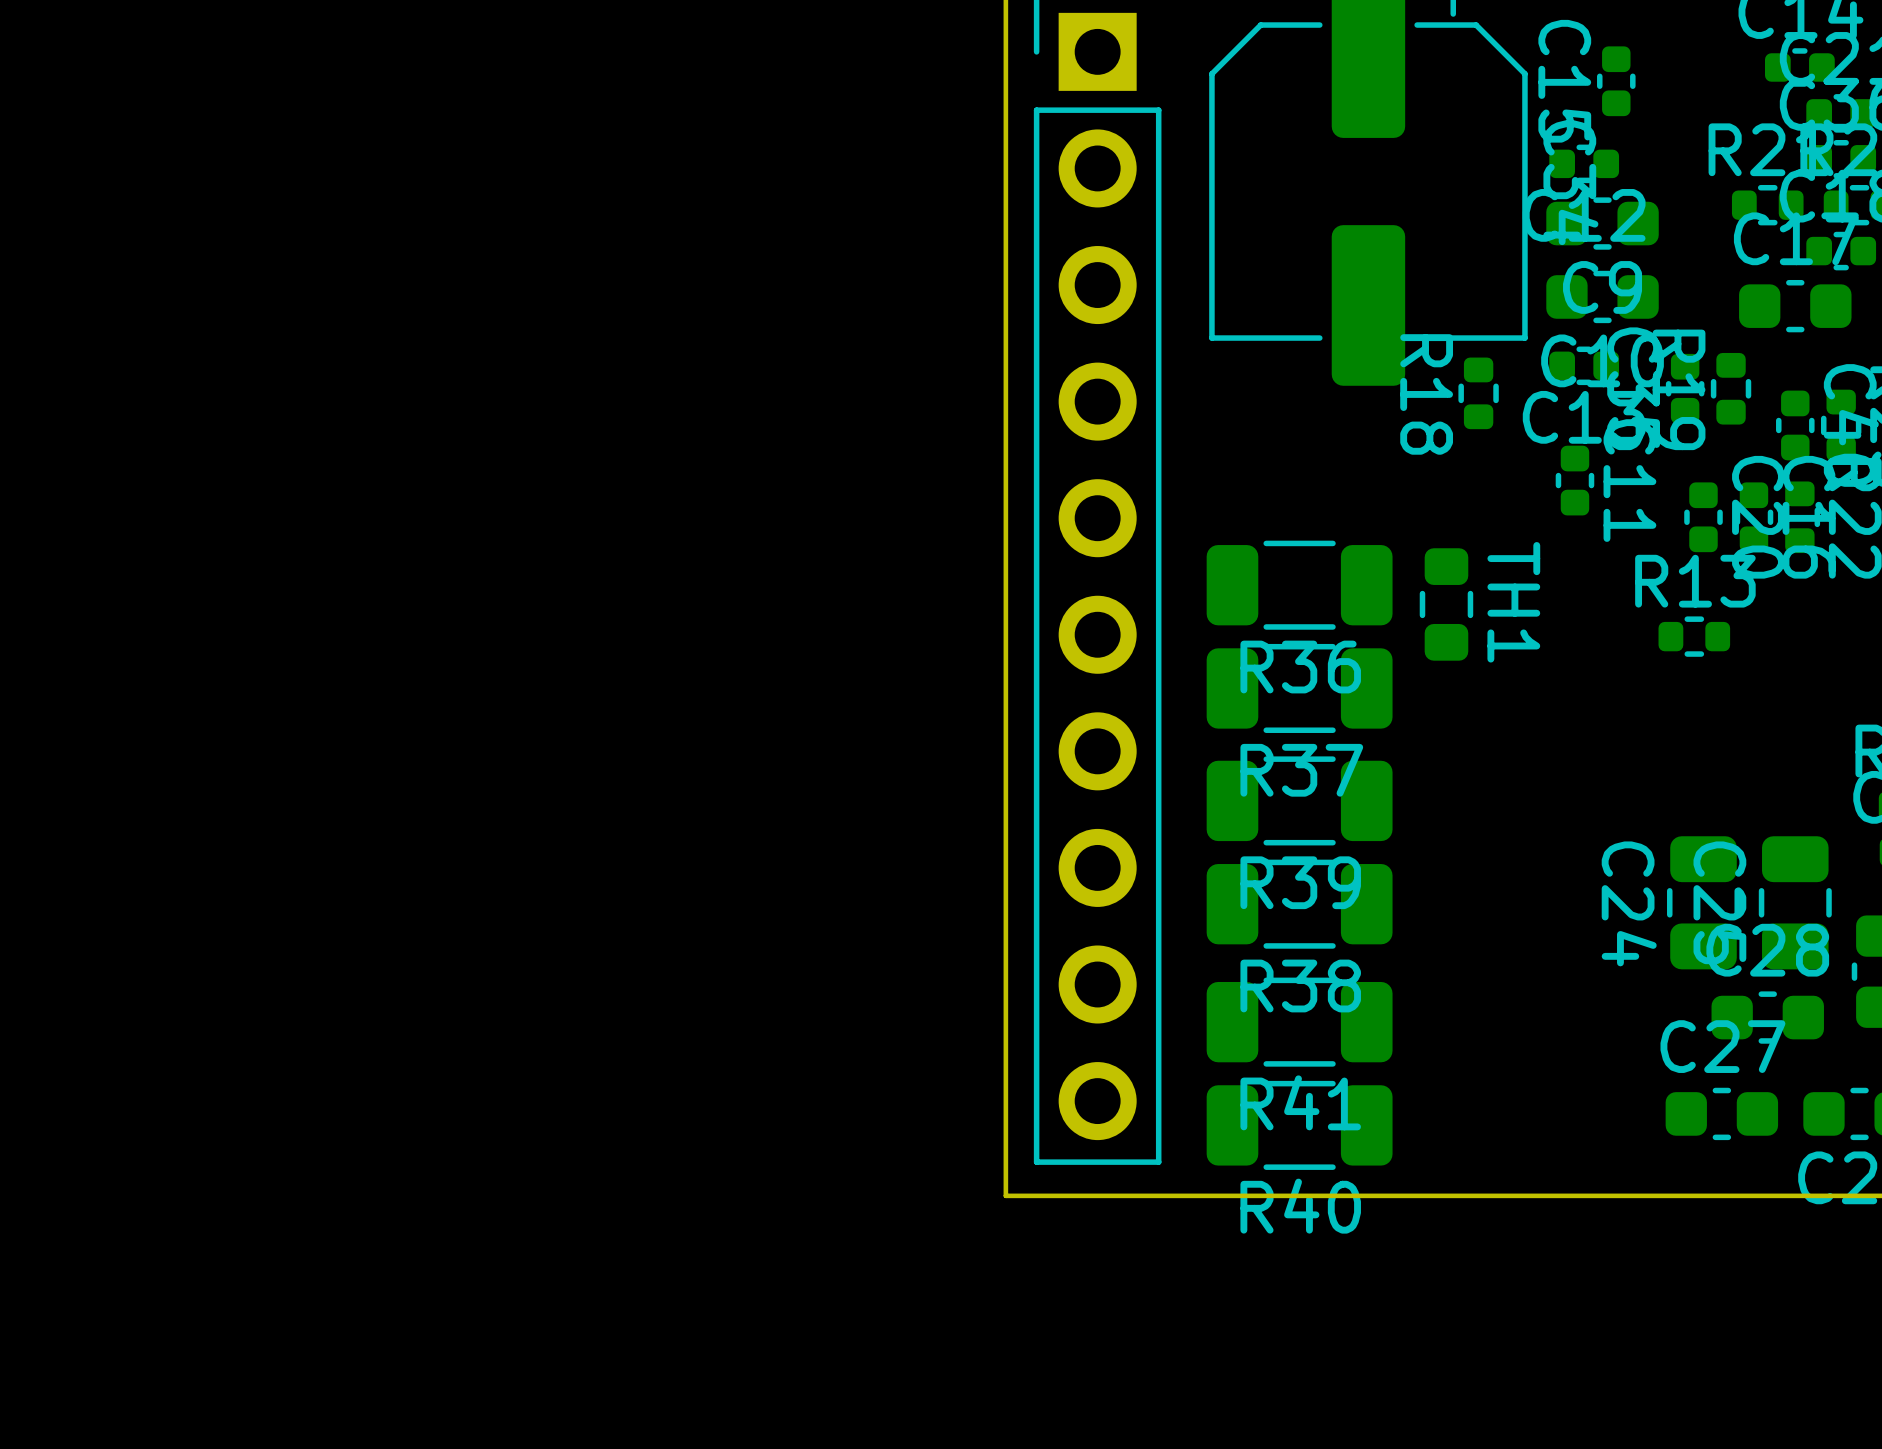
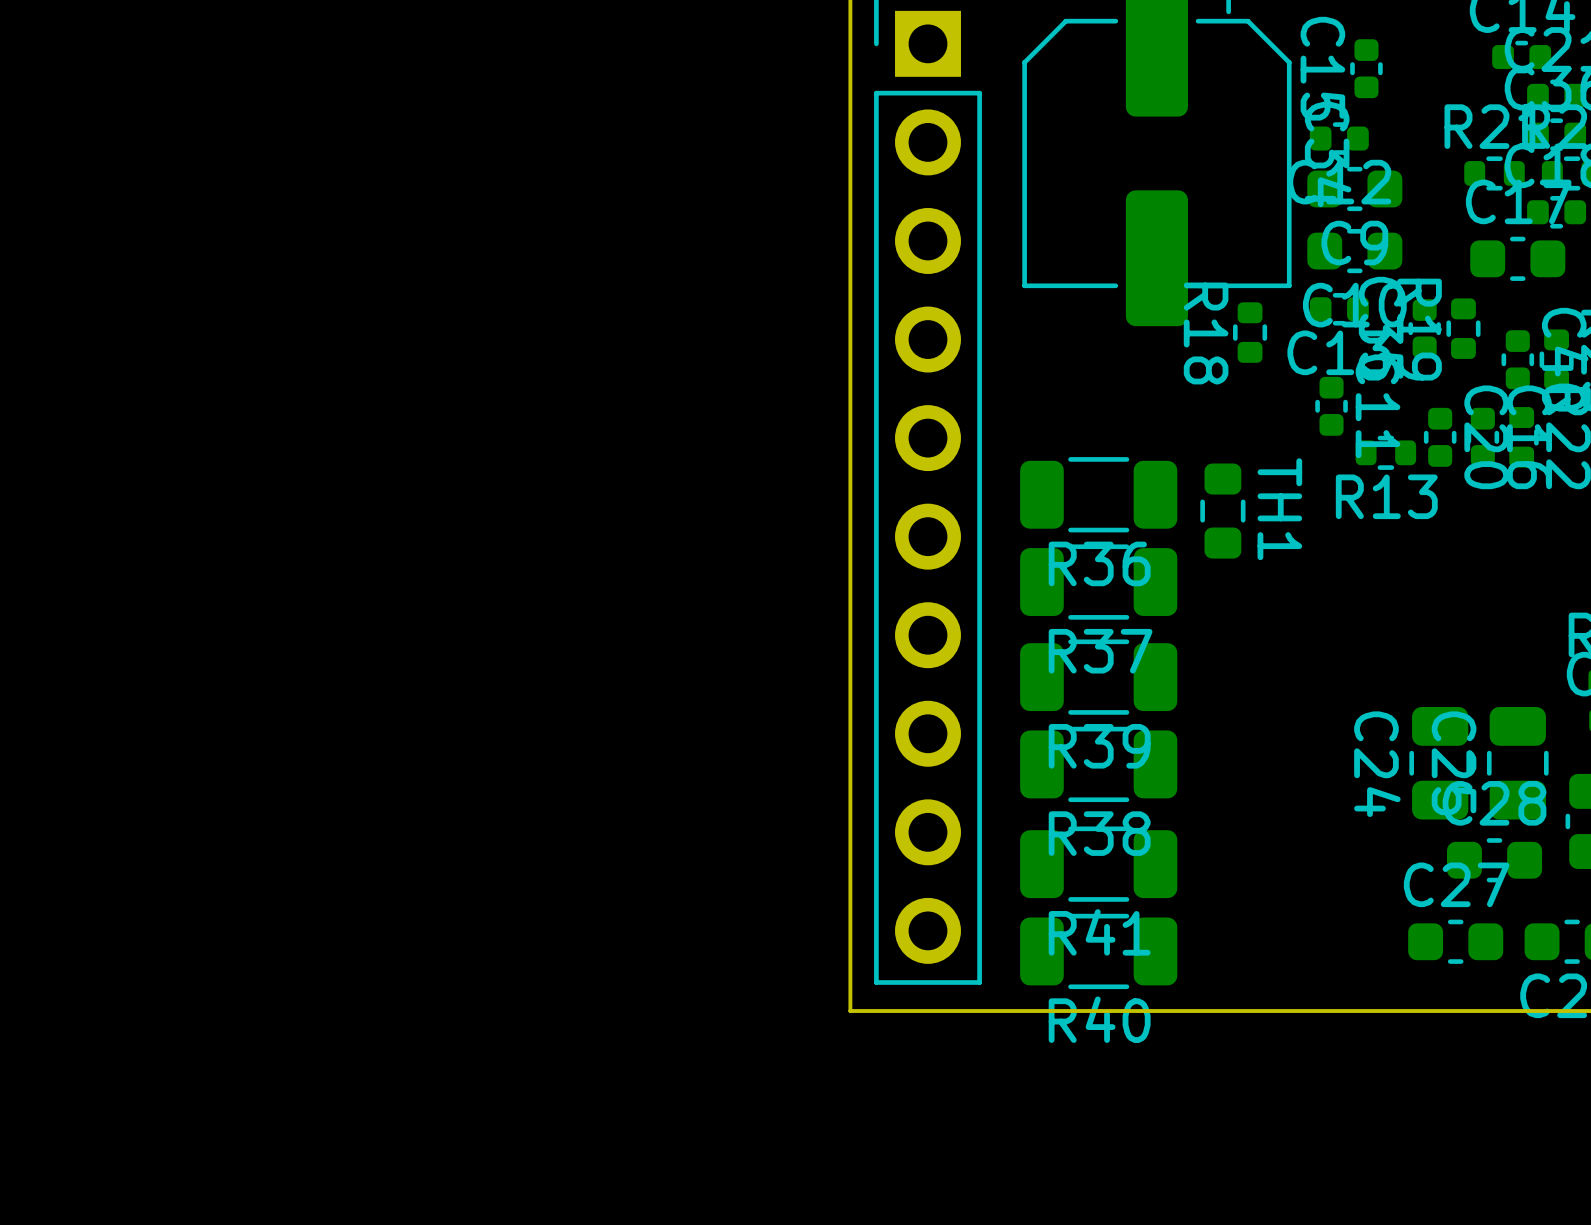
R13 name position: R13 (1695, 581) -> R13 (1386, 496)
R13 position: (1694, 636) -> (1385, 452)

